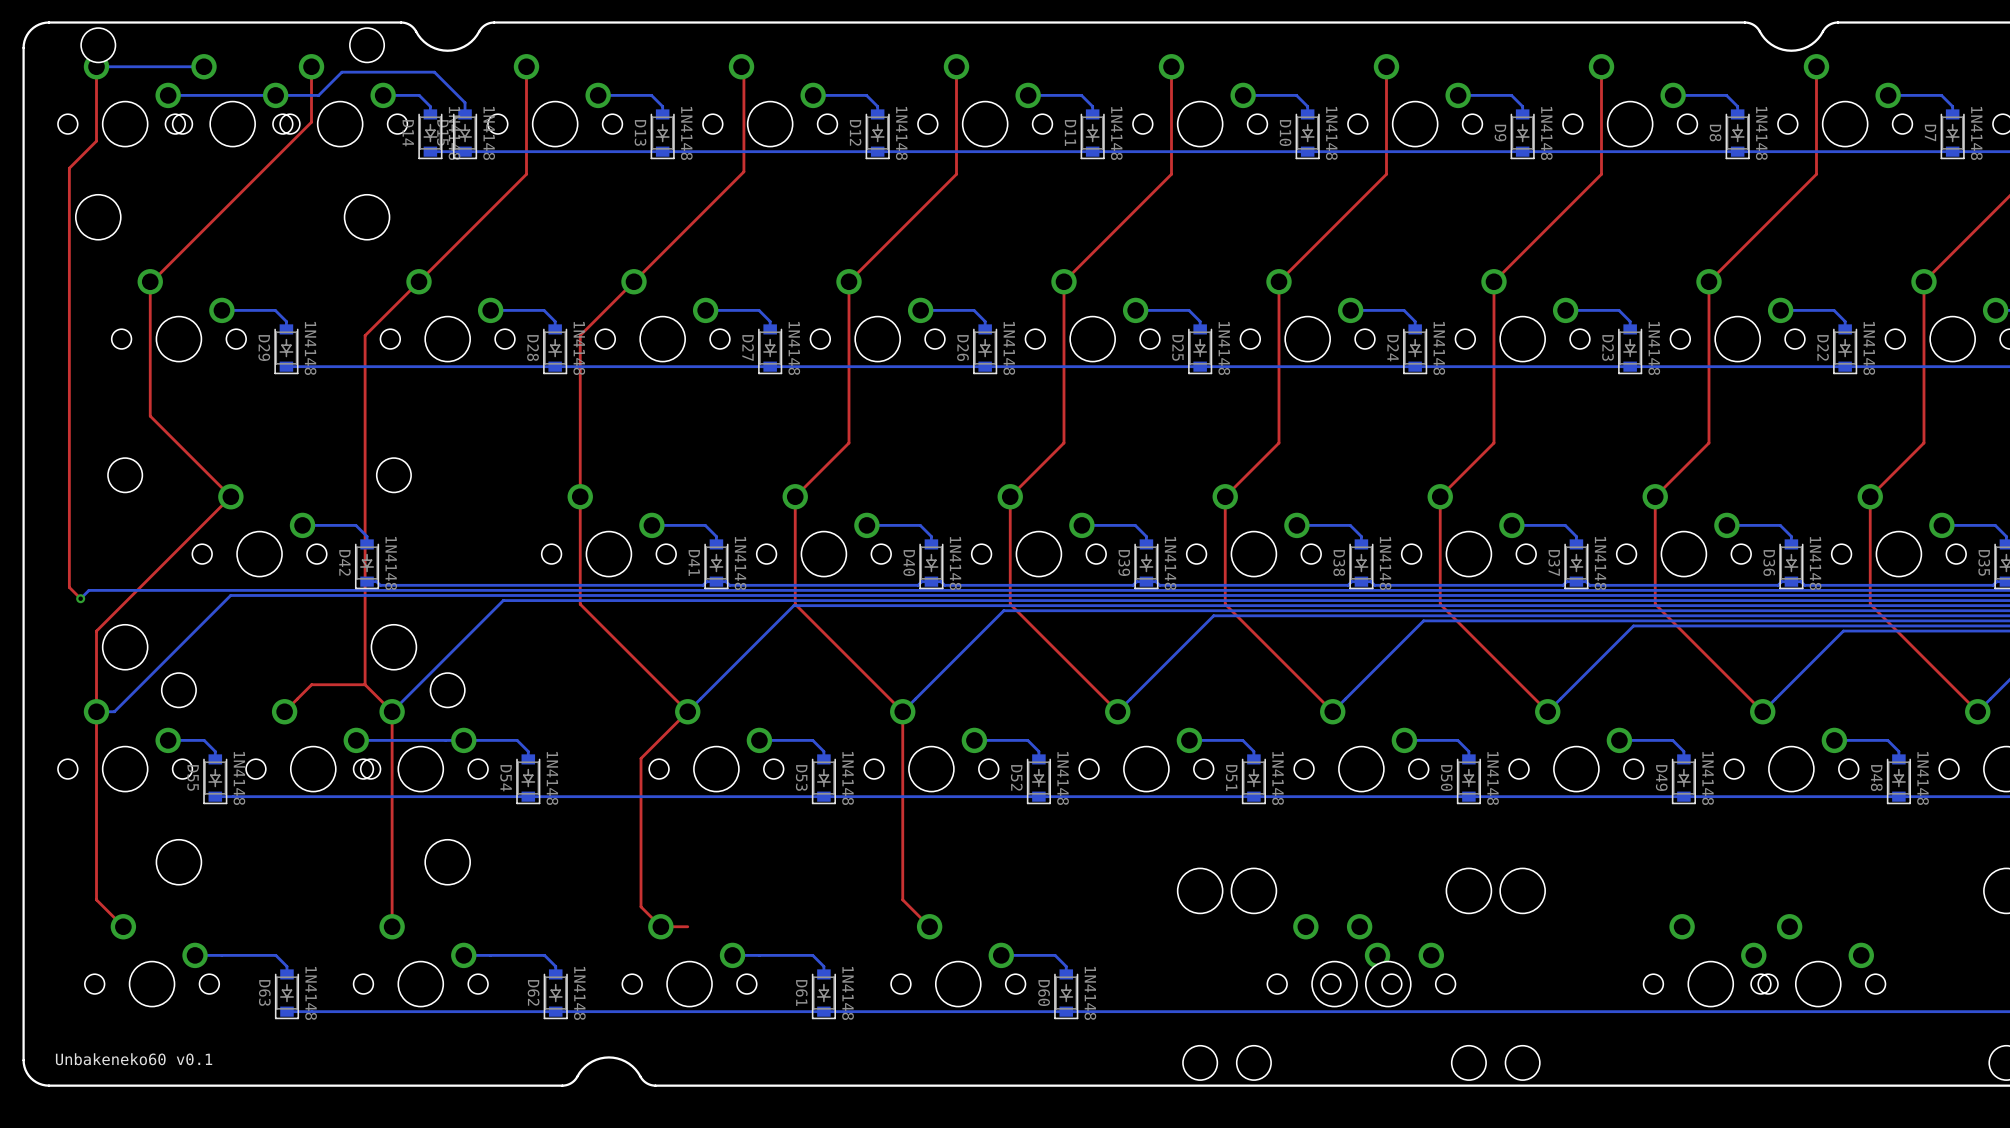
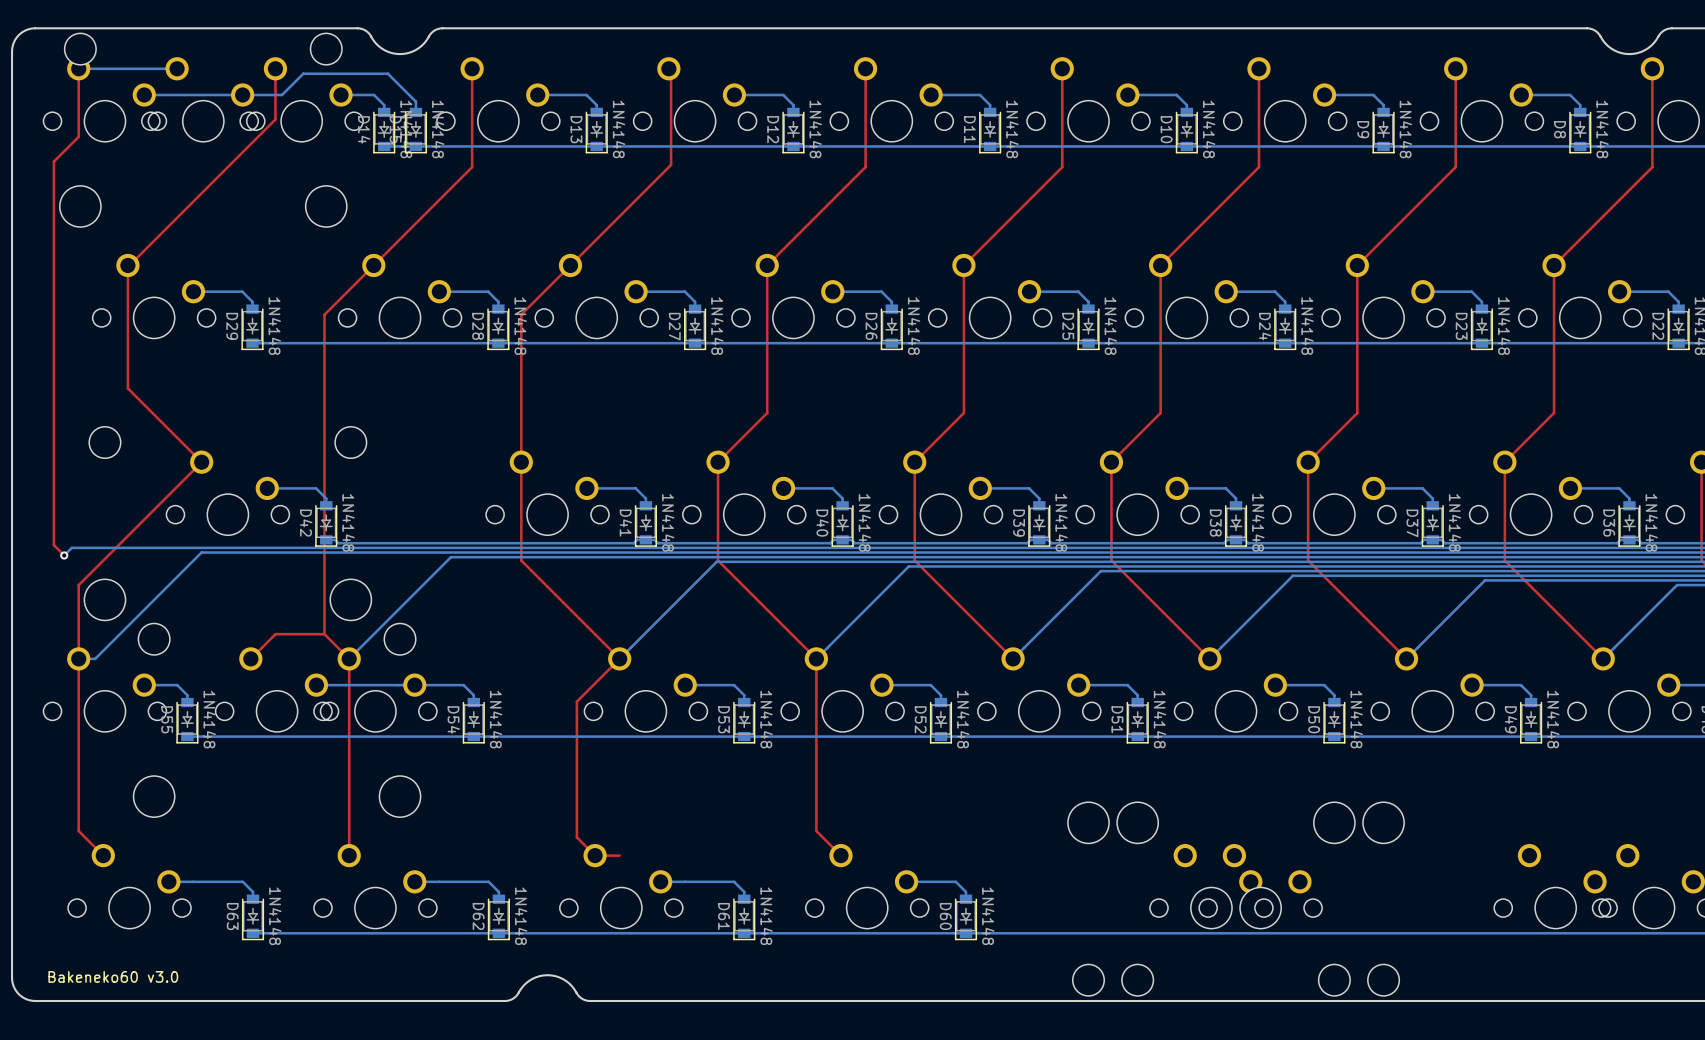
text: Unbakeneko60 v0.1 (134, 1059) -> Bakeneko60 v3.0 (113, 976)

